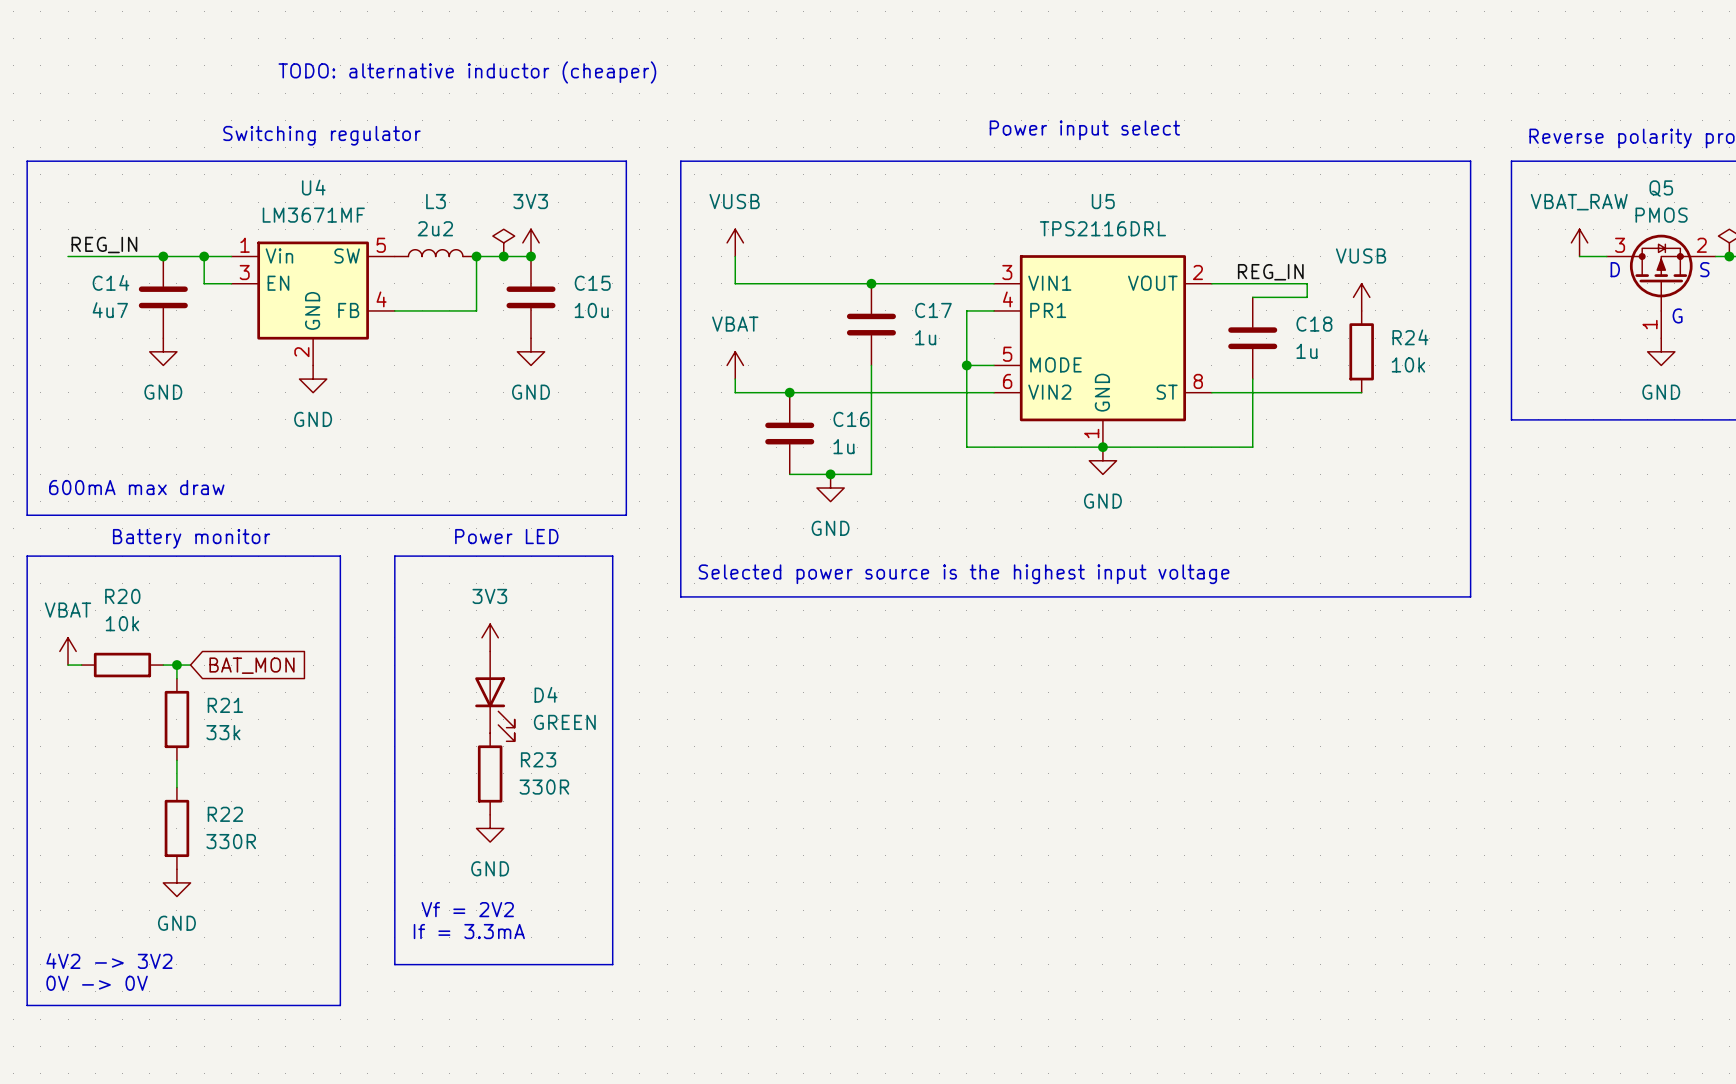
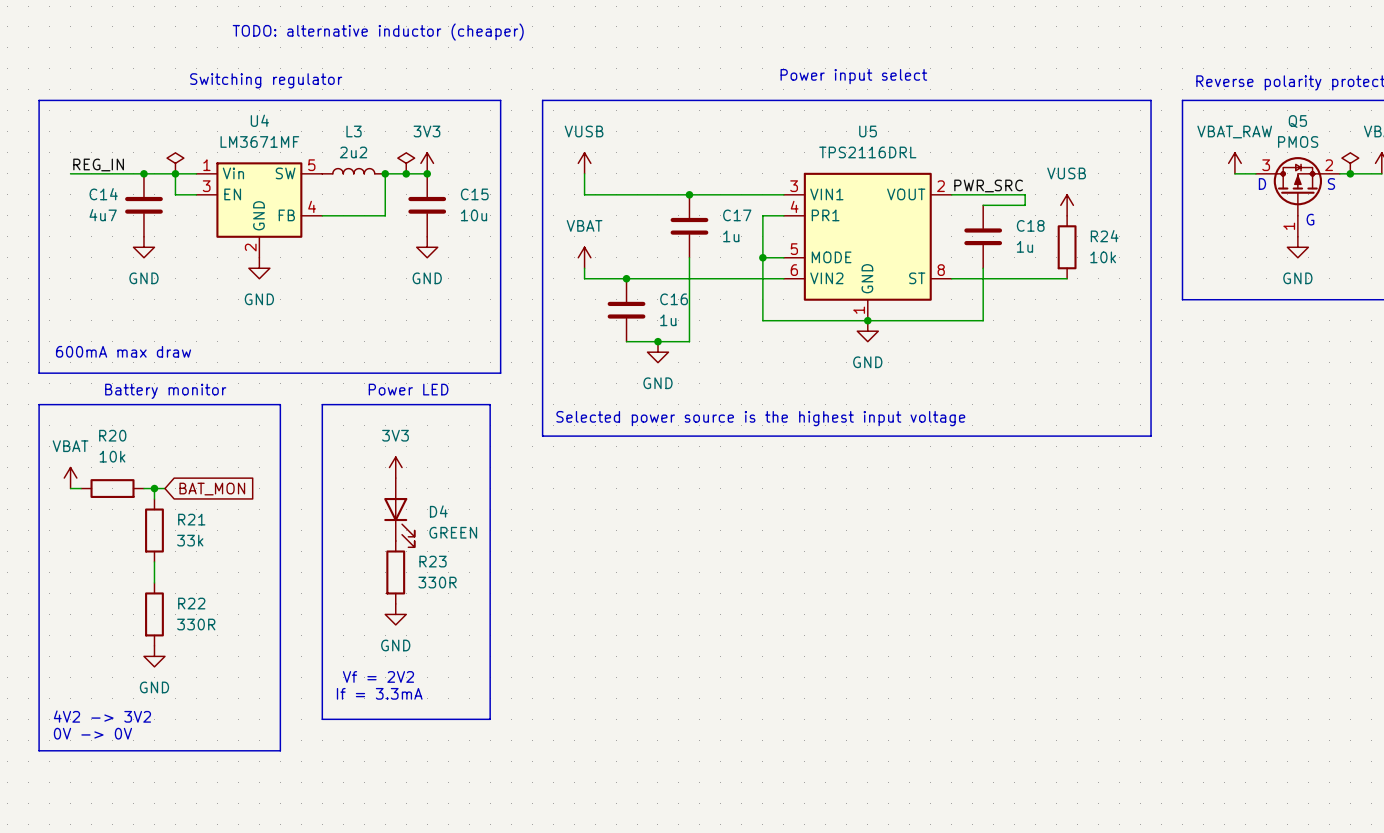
power symbol: none -> (175, 163)
label: REG_IN (1270, 272) -> PWR_SRC (988, 185)

